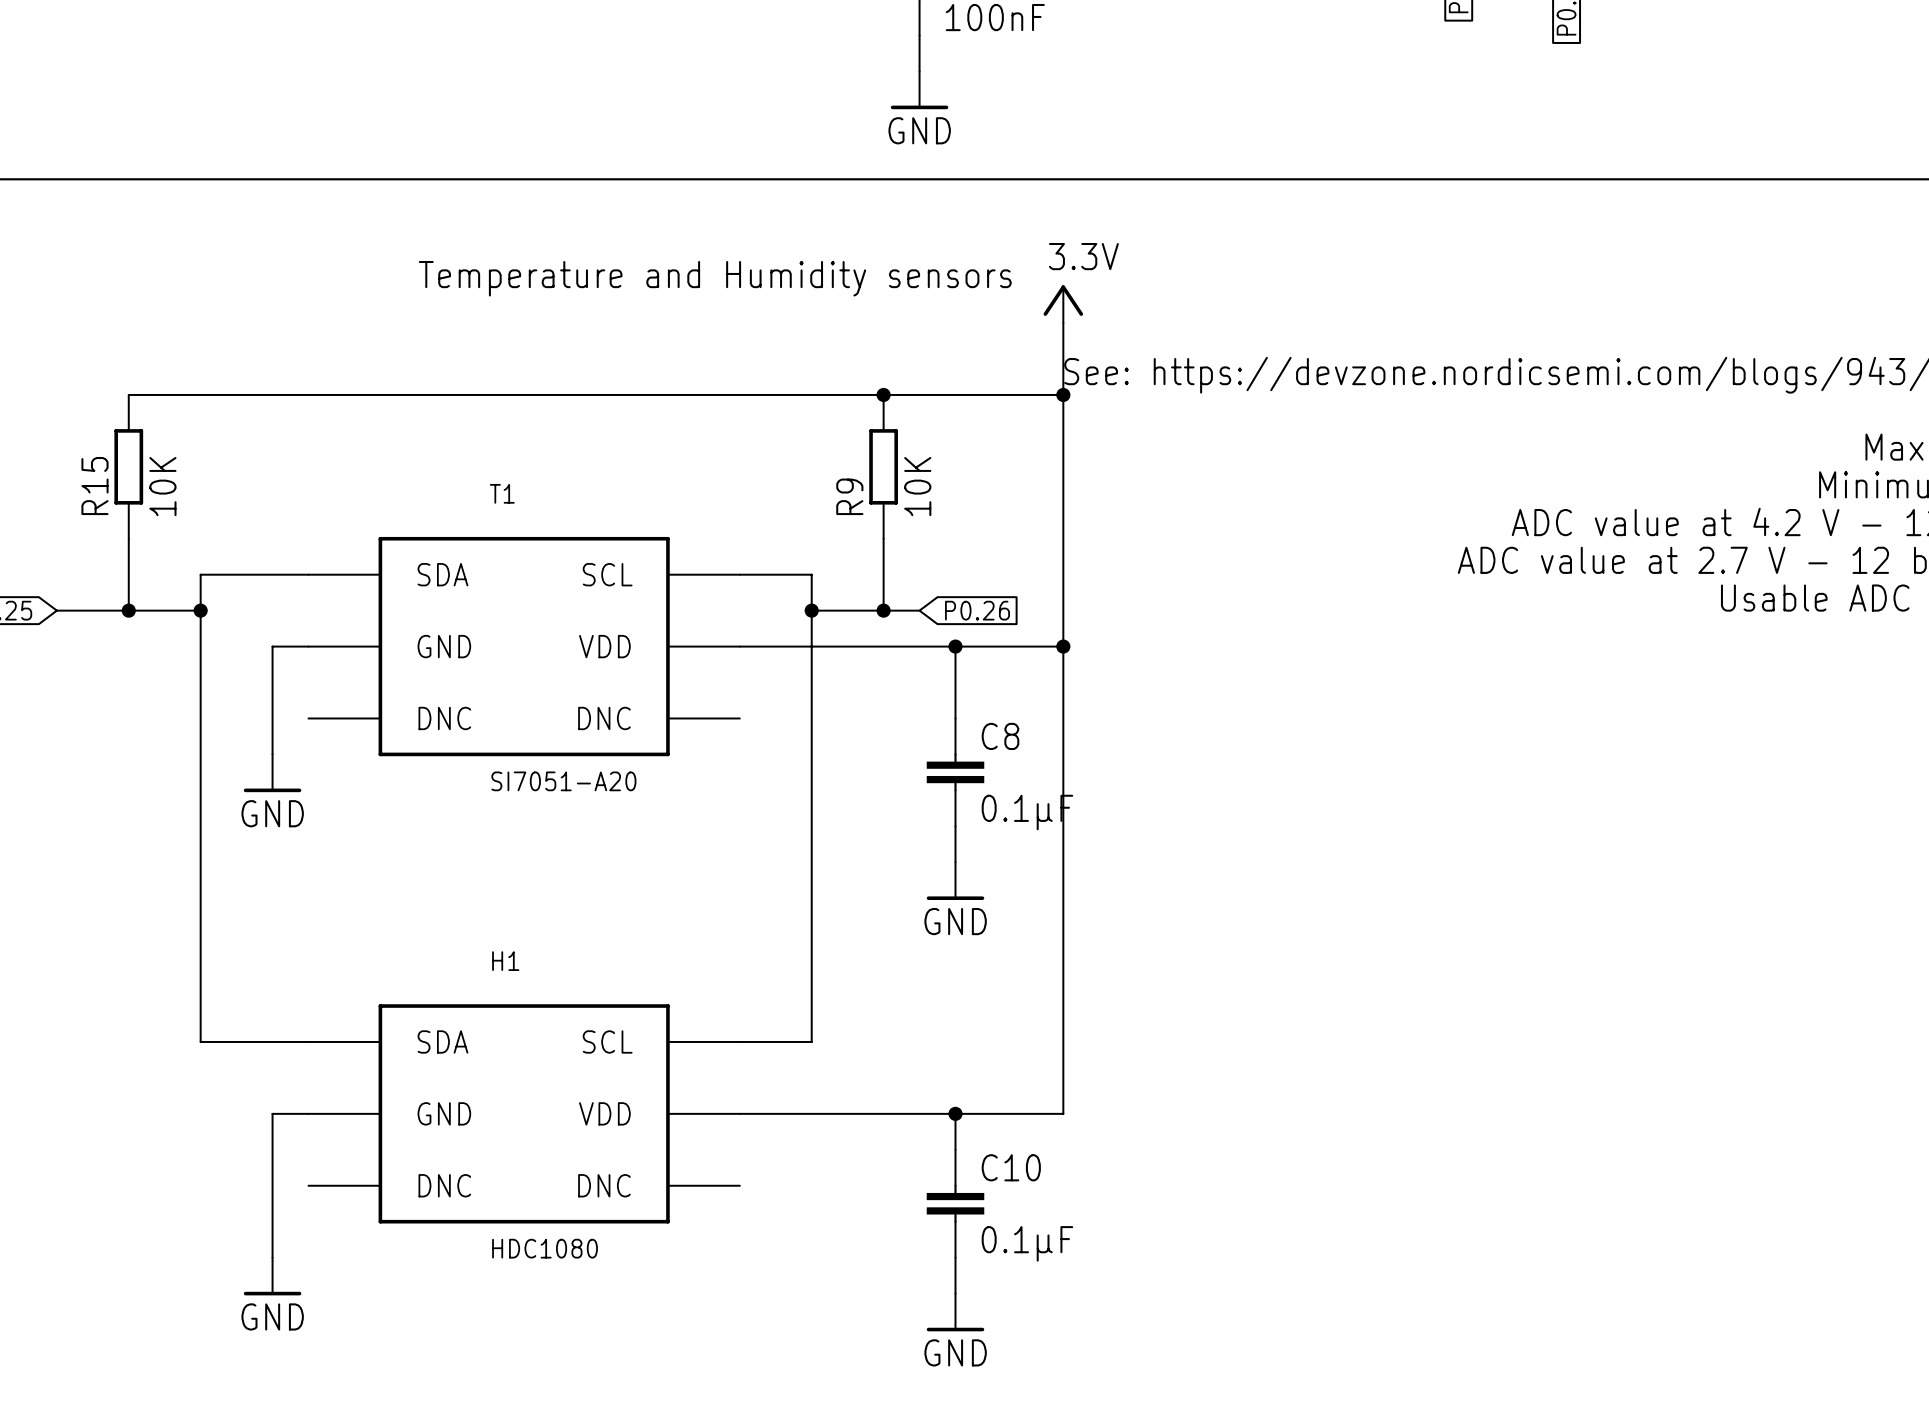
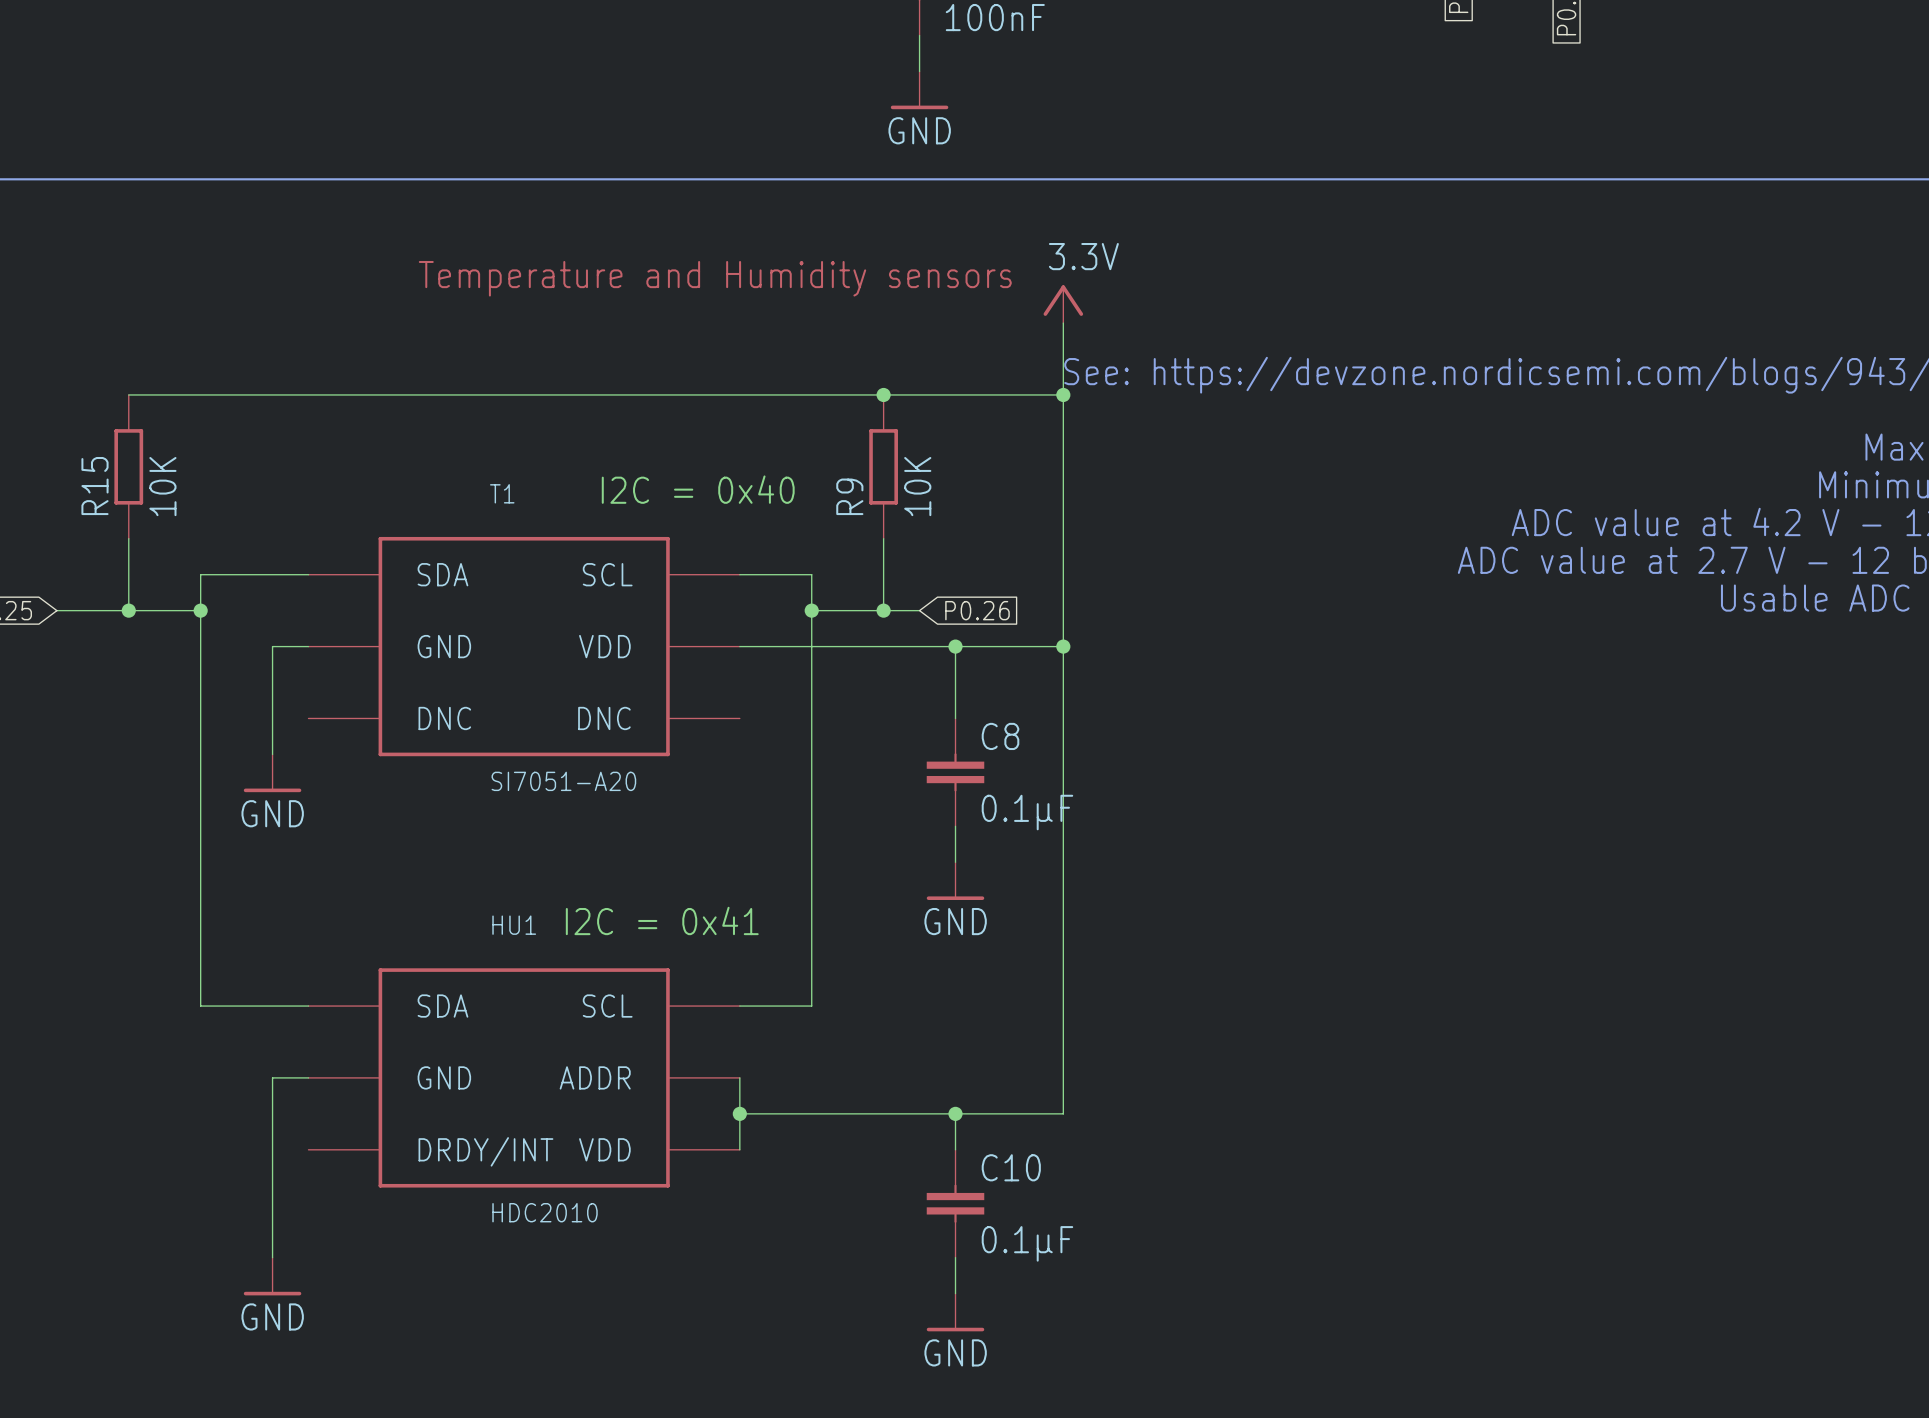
text: none -> I2C = 0x40 (698, 489)
text: none -> I2C = 0x41 (662, 920)
wire: (200, 1006) (200, 1041) (308, 1041) -> (200, 1006) (308, 1006)
wire: (811, 1006) (811, 1041) (739, 1041) -> (811, 1006) (739, 1006)
HU1: none -> HDC2010 (524, 1077)
wire: none -> (739, 1077) (739, 1149)
wire: (272, 1113) (308, 1113) -> (272, 1113) (272, 1077) (308, 1077)
H1: HDC1080 (524, 1113) -> none
junction: none -> (739, 1113)

